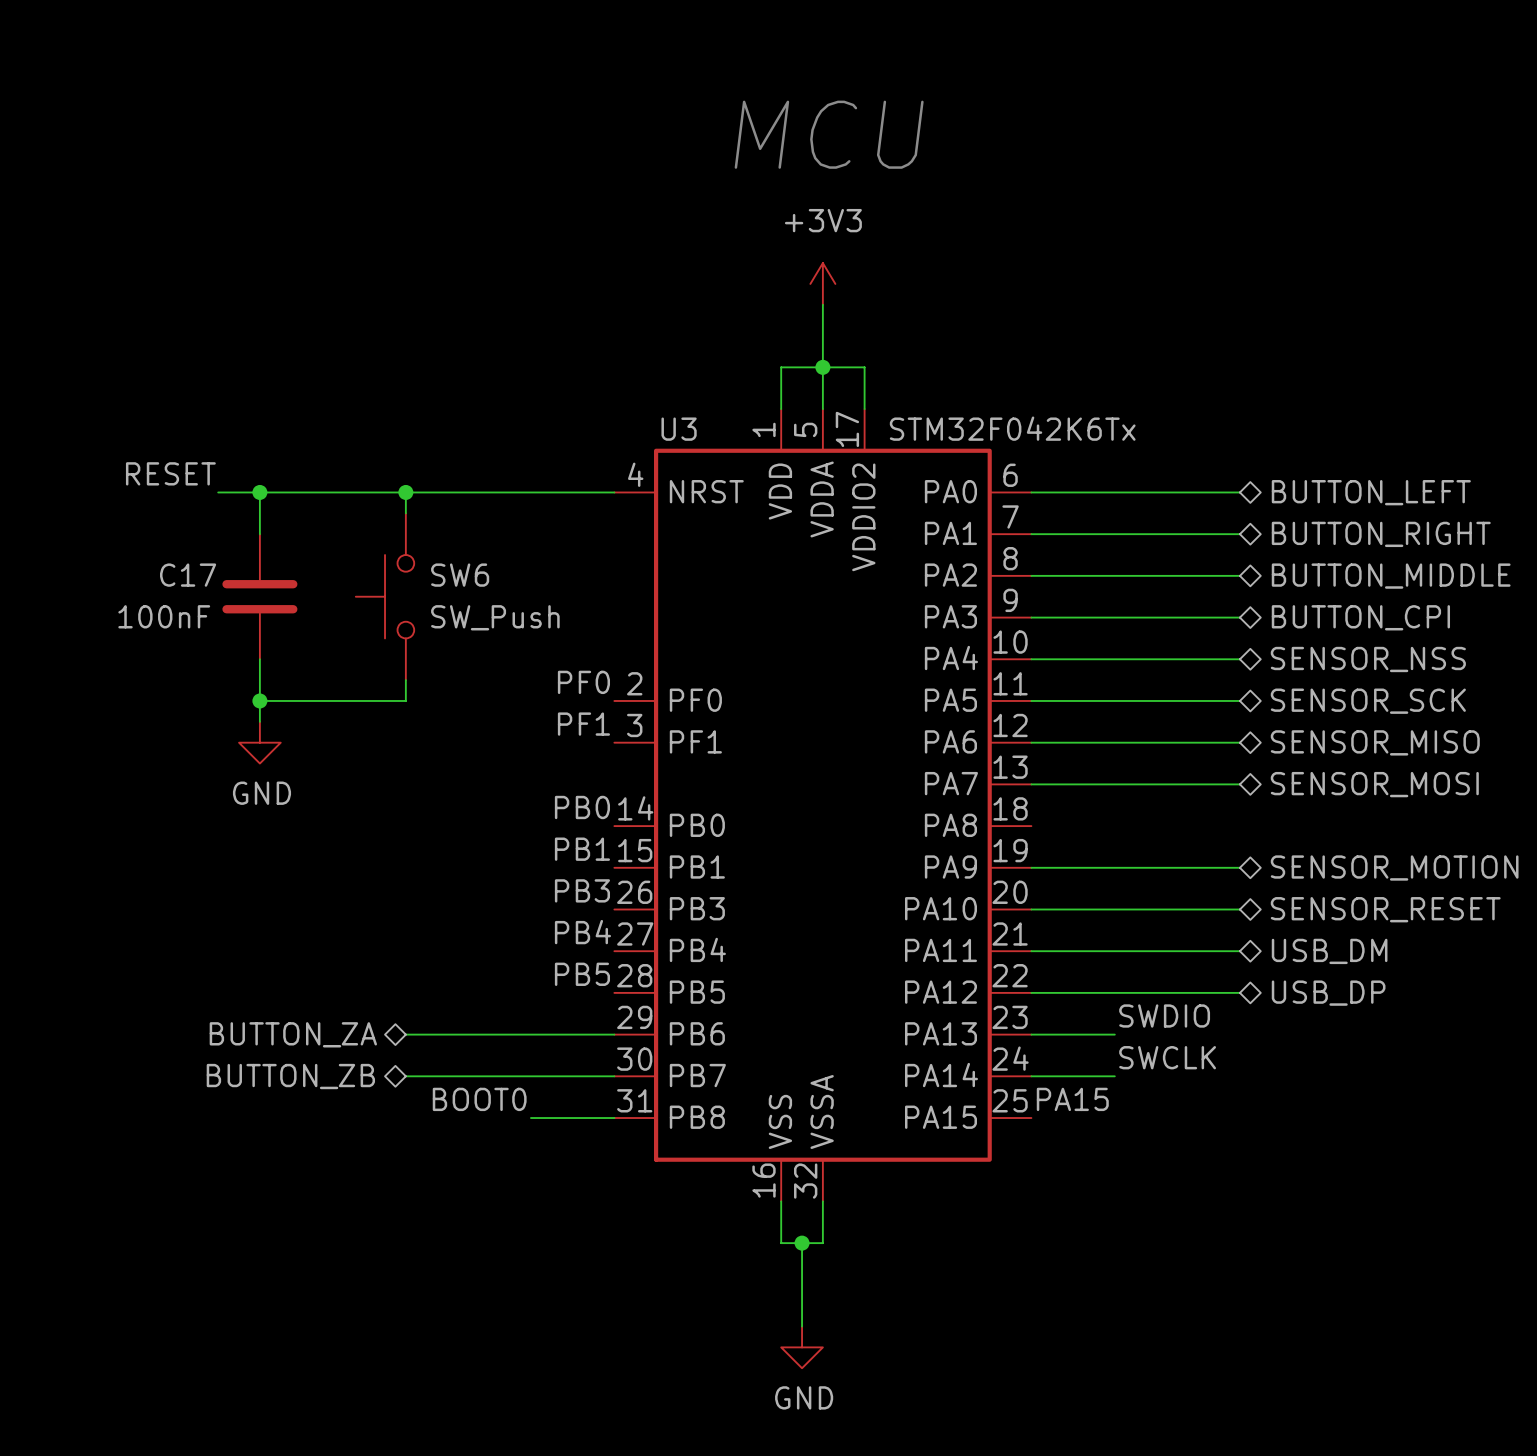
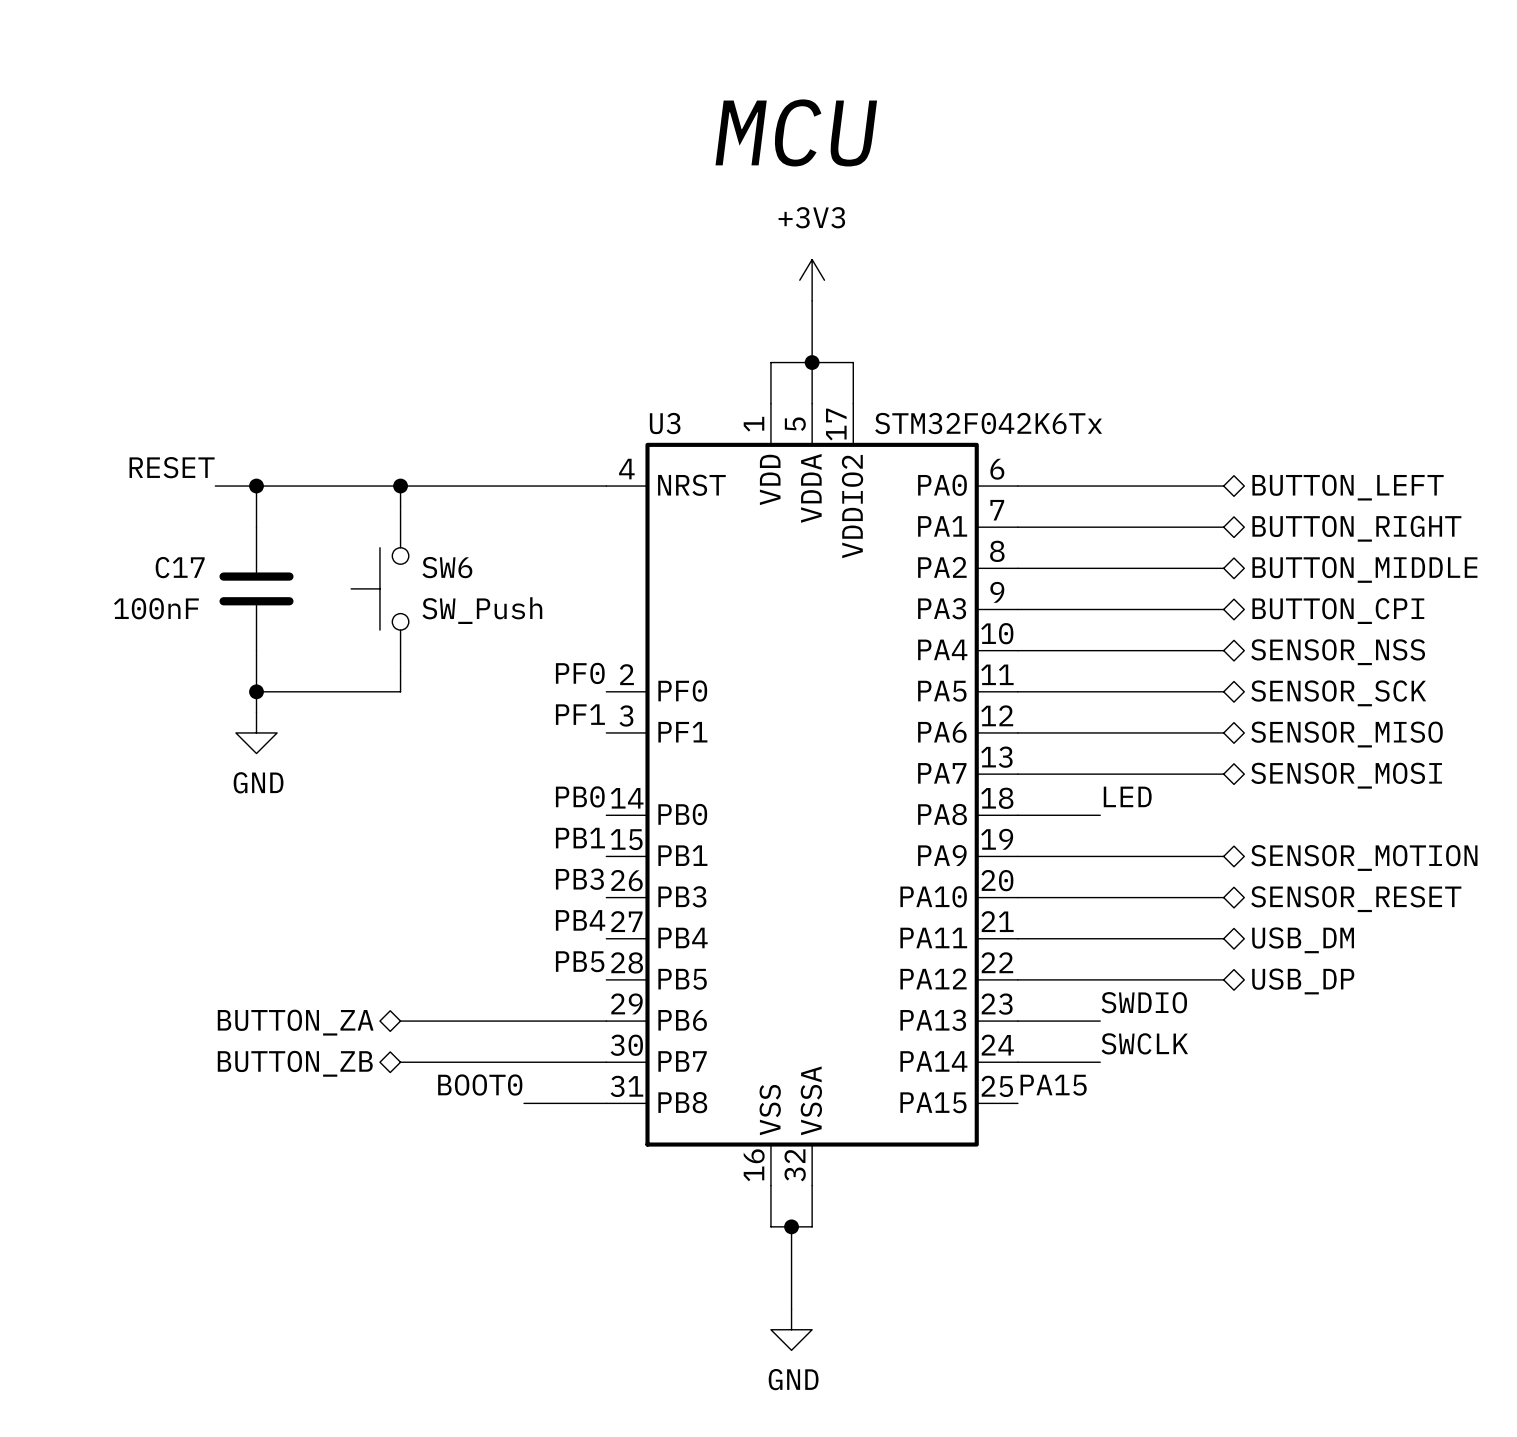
label: none -> LED (1127, 796)
wire: none -> (1017, 815) (1100, 815)

